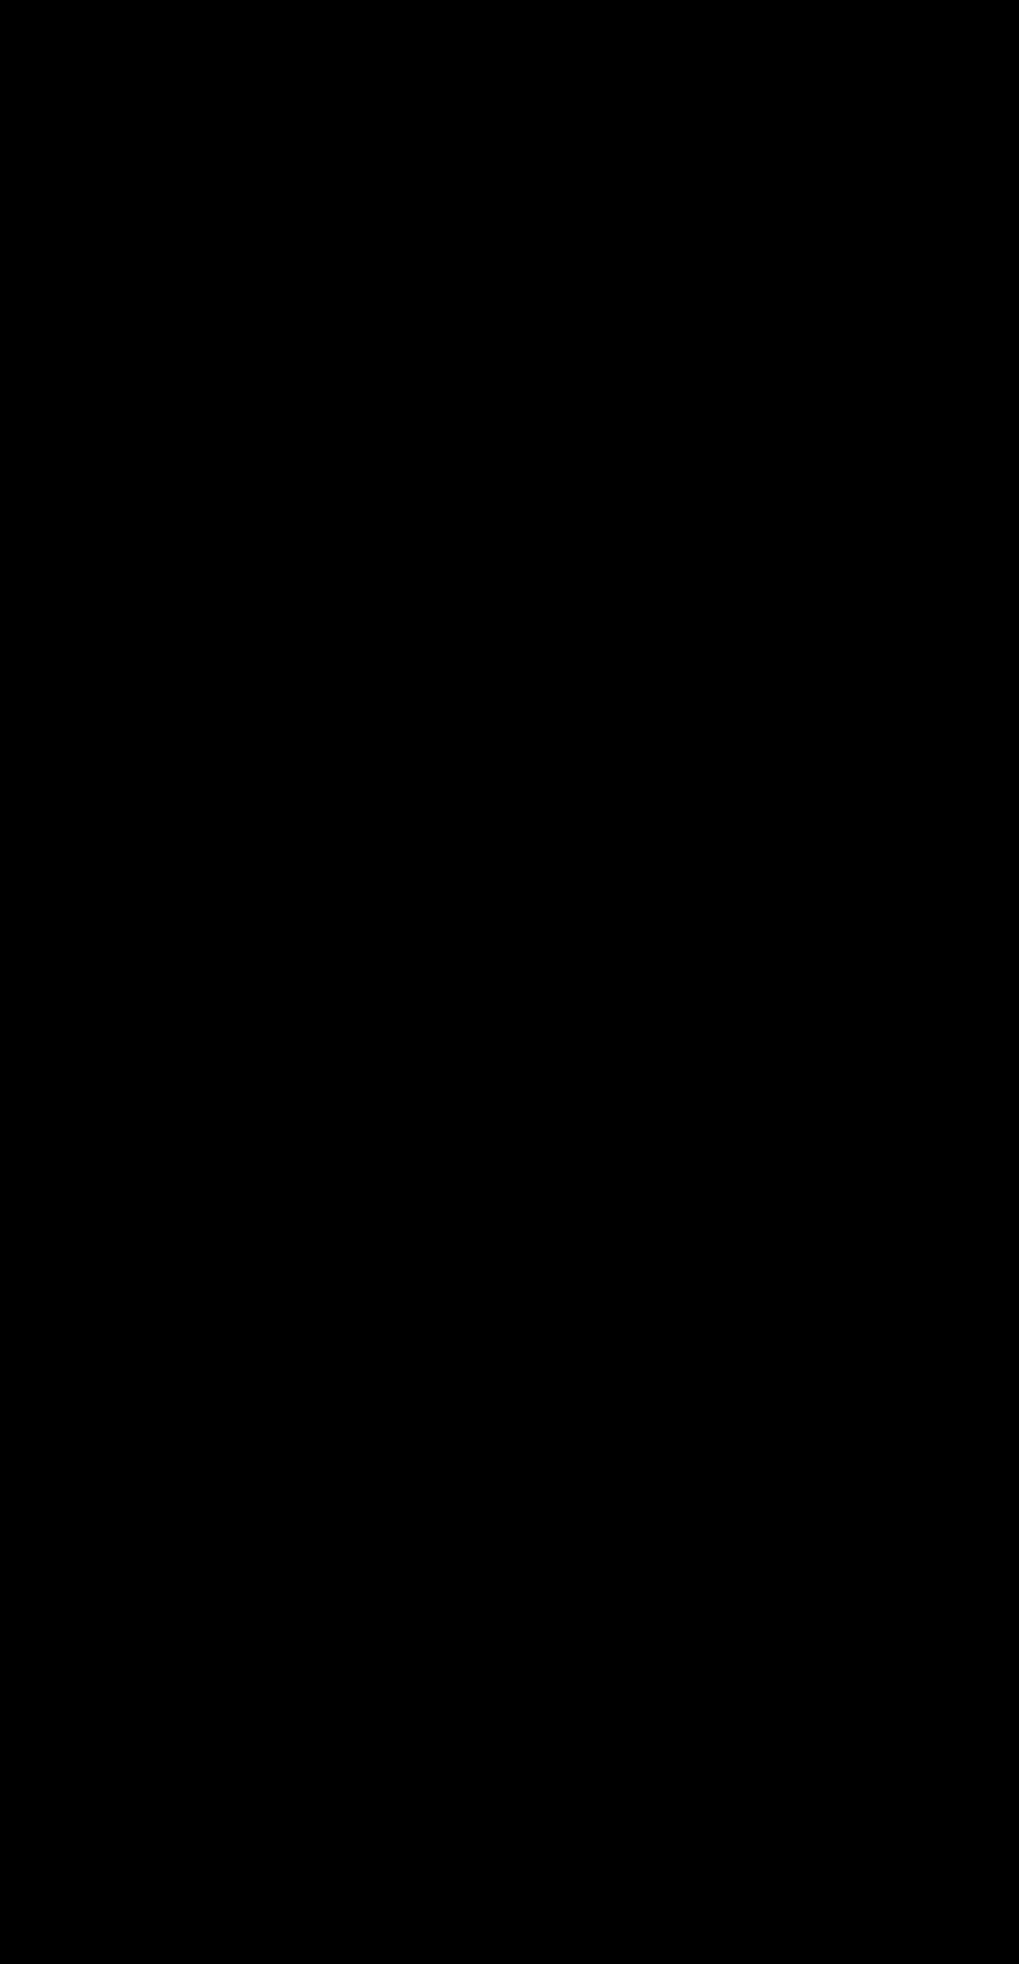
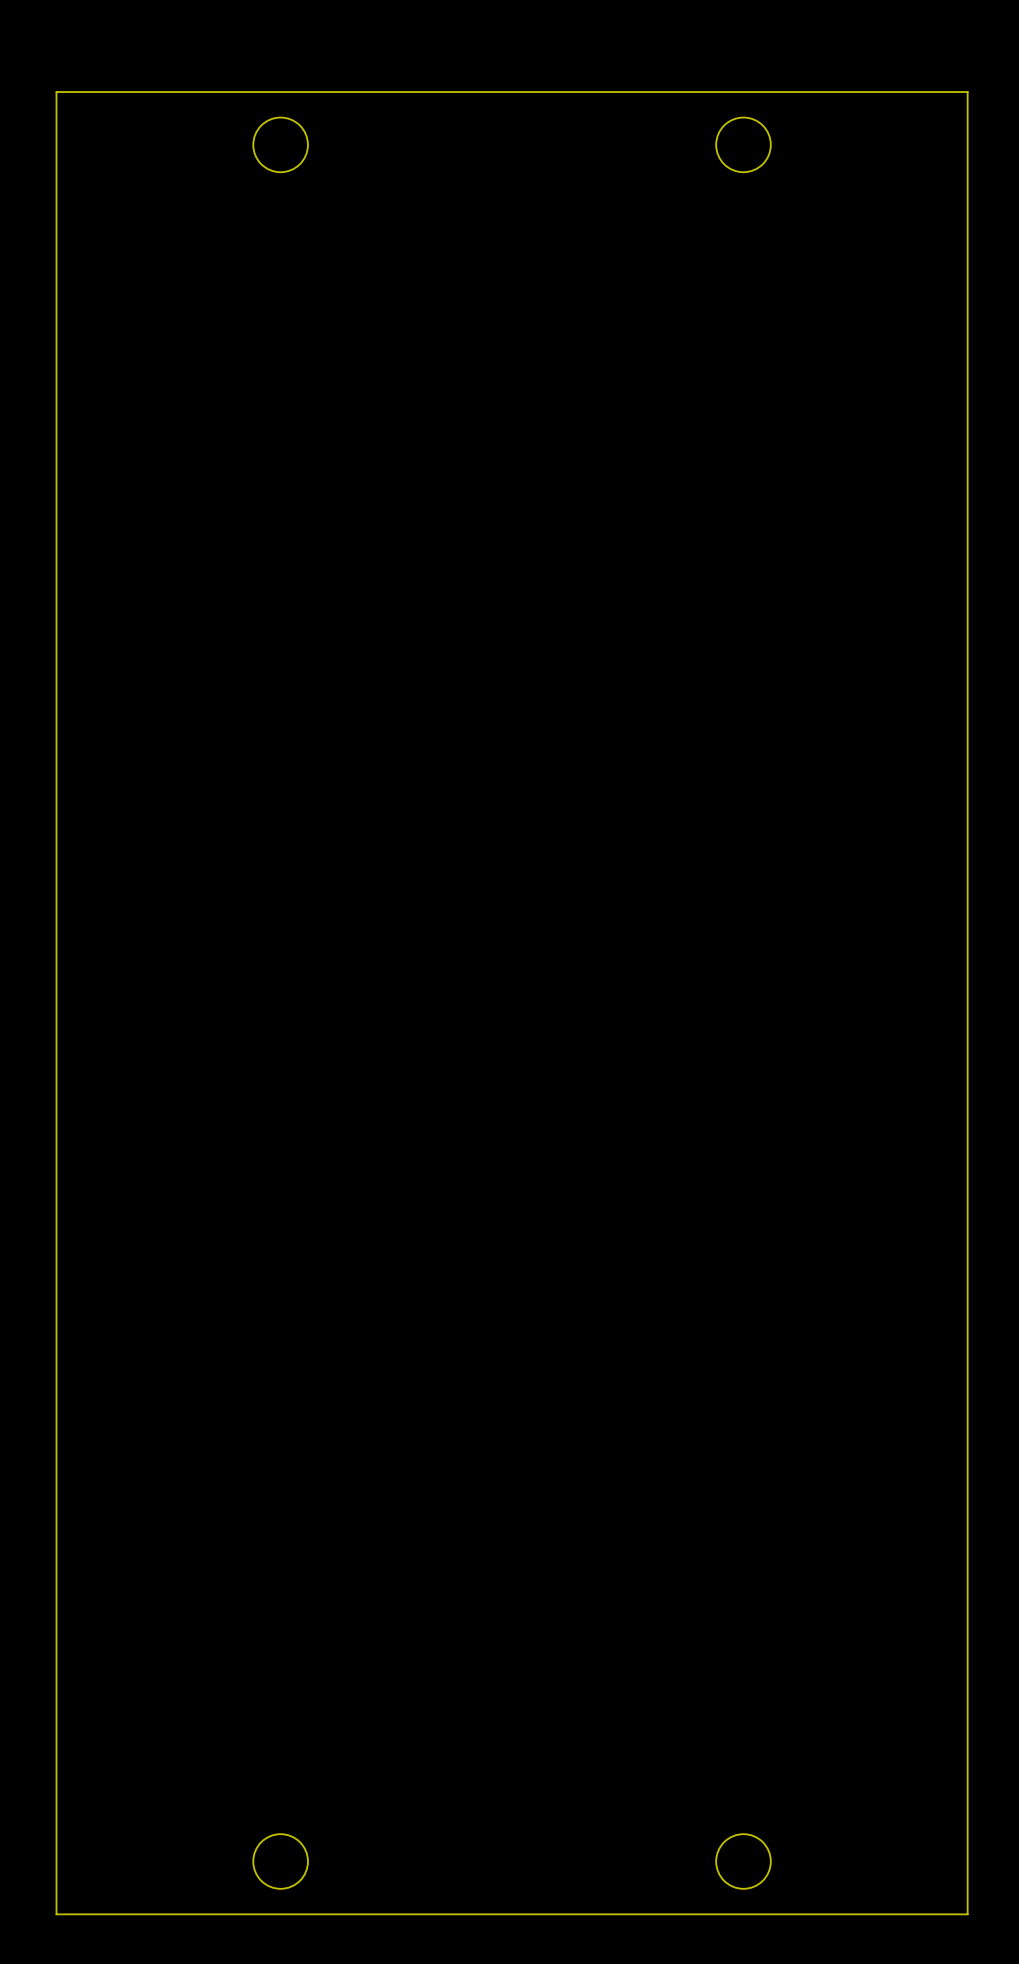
board edge: none -> (967, 92) (56, 92) (56, 1914) (967, 1914) (967, 92)
round board edge: none -> [252, 116, 309, 174]
round board edge: none -> [715, 116, 772, 174]
round board edge: none -> [252, 1833, 309, 1890]
round board edge: none -> [715, 1833, 772, 1890]

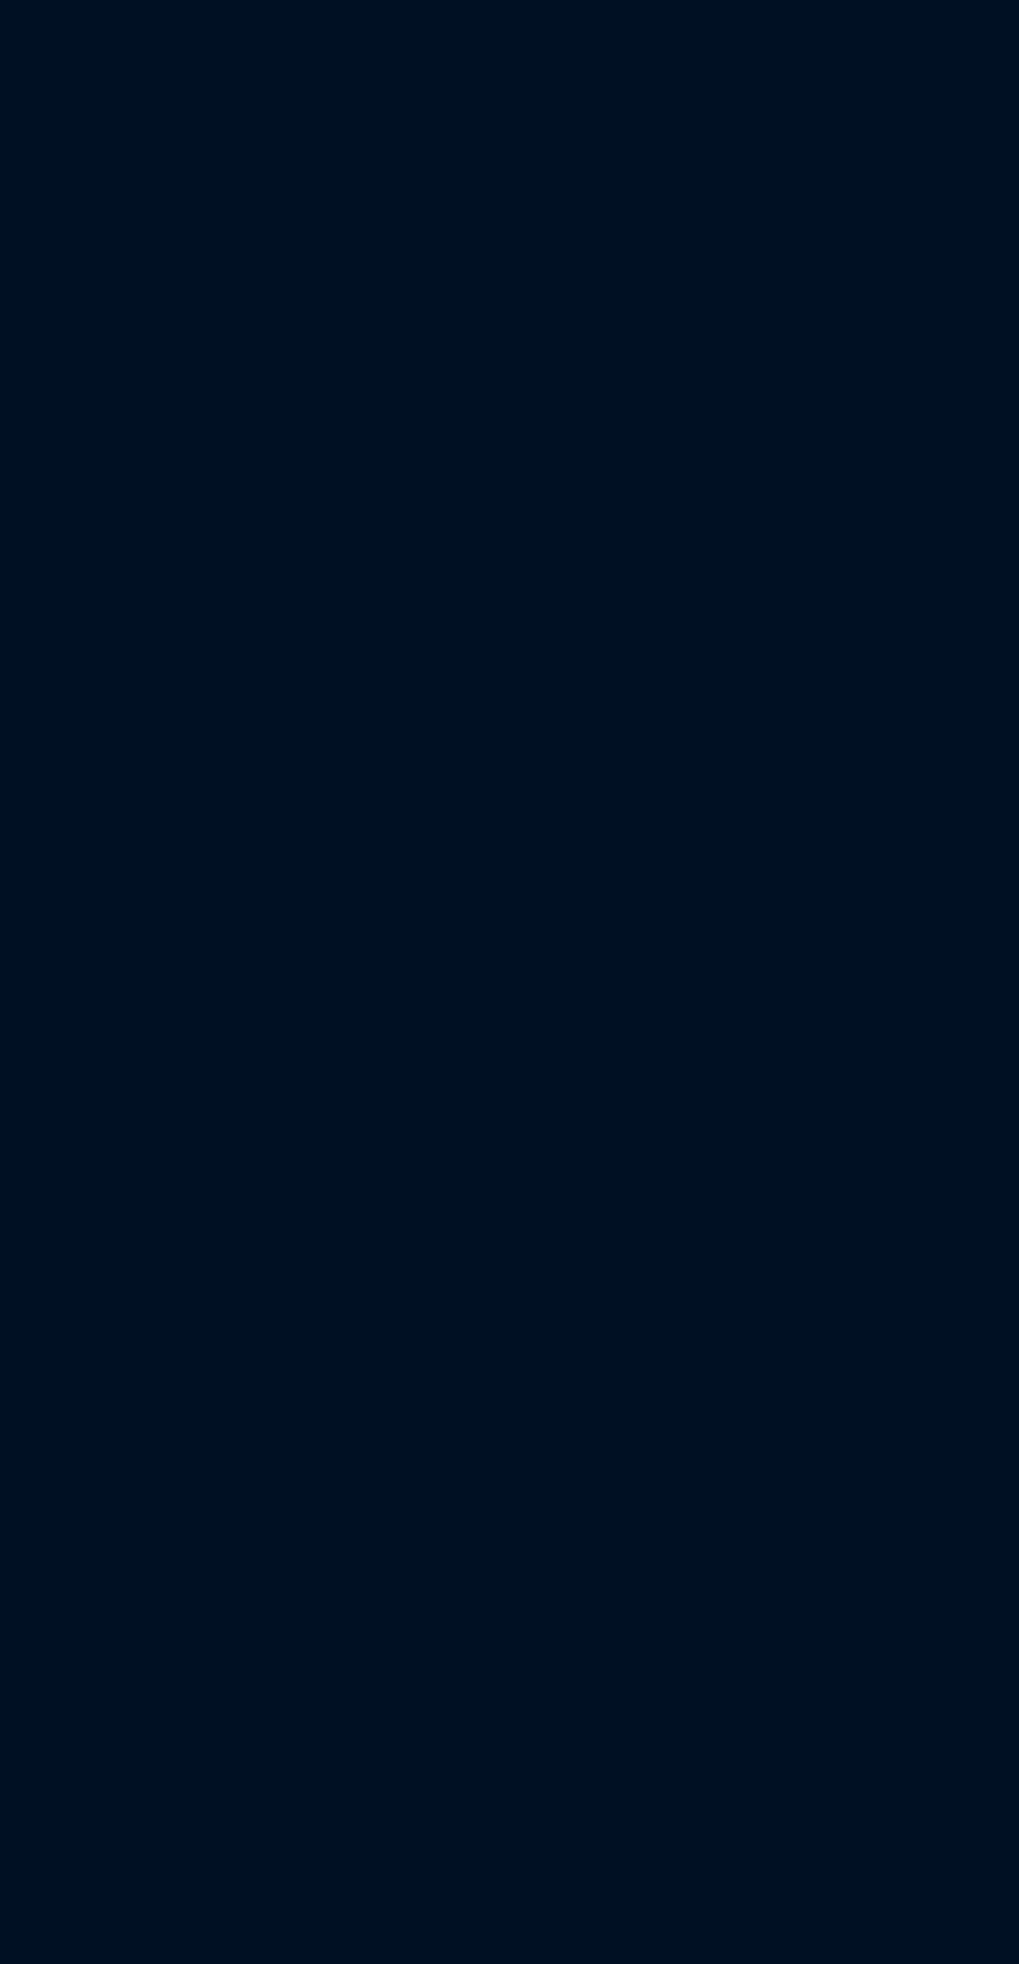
board edge: (967, 92) (56, 92) (56, 1914) (967, 1914) (967, 92) -> none
round board edge: [252, 116, 309, 174] -> none
round board edge: [715, 116, 772, 174] -> none
round board edge: [252, 1833, 309, 1890] -> none
round board edge: [715, 1833, 772, 1890] -> none

